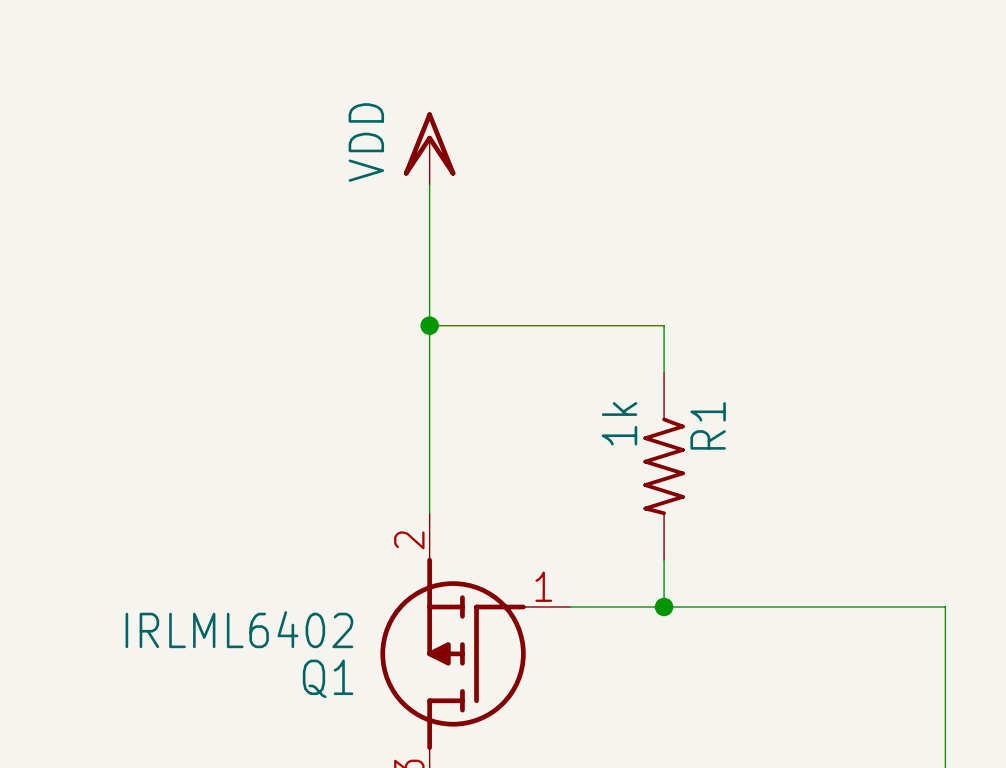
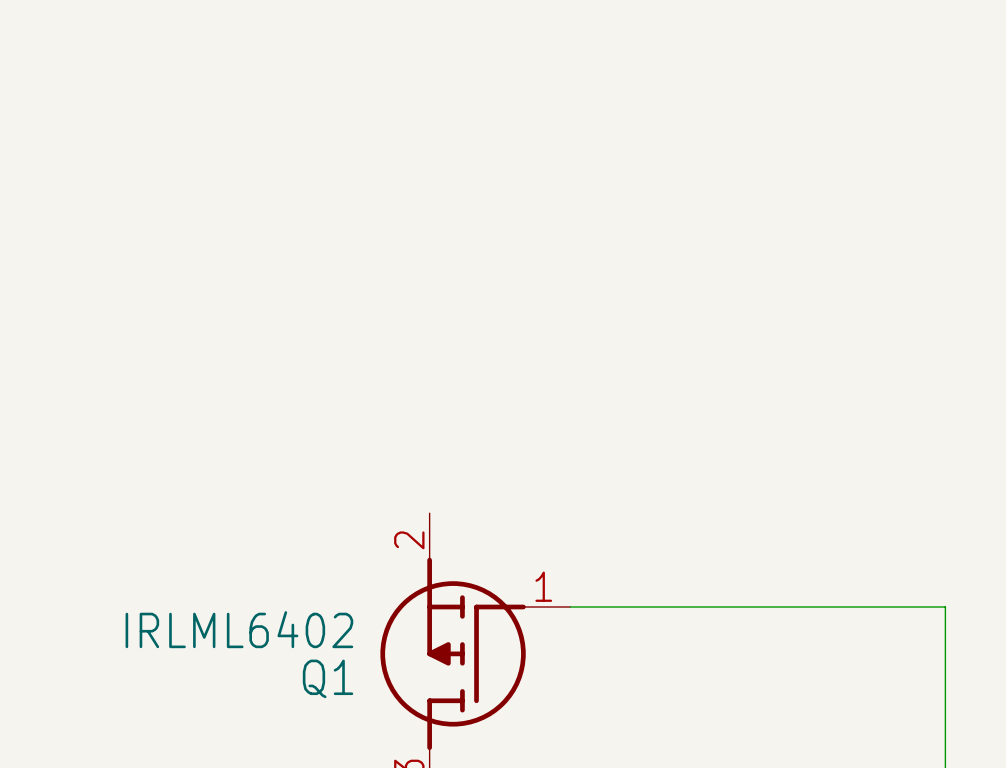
power symbol: VDD (429, 148) -> none
wire: (429, 185) (429, 513) -> none
wire: (429, 325) (664, 325) (664, 372) -> none
junction: (429, 325) -> none
R1: 1k (664, 466) -> none
wire: (664, 560) (664, 607) -> none
junction: (664, 607) -> none

